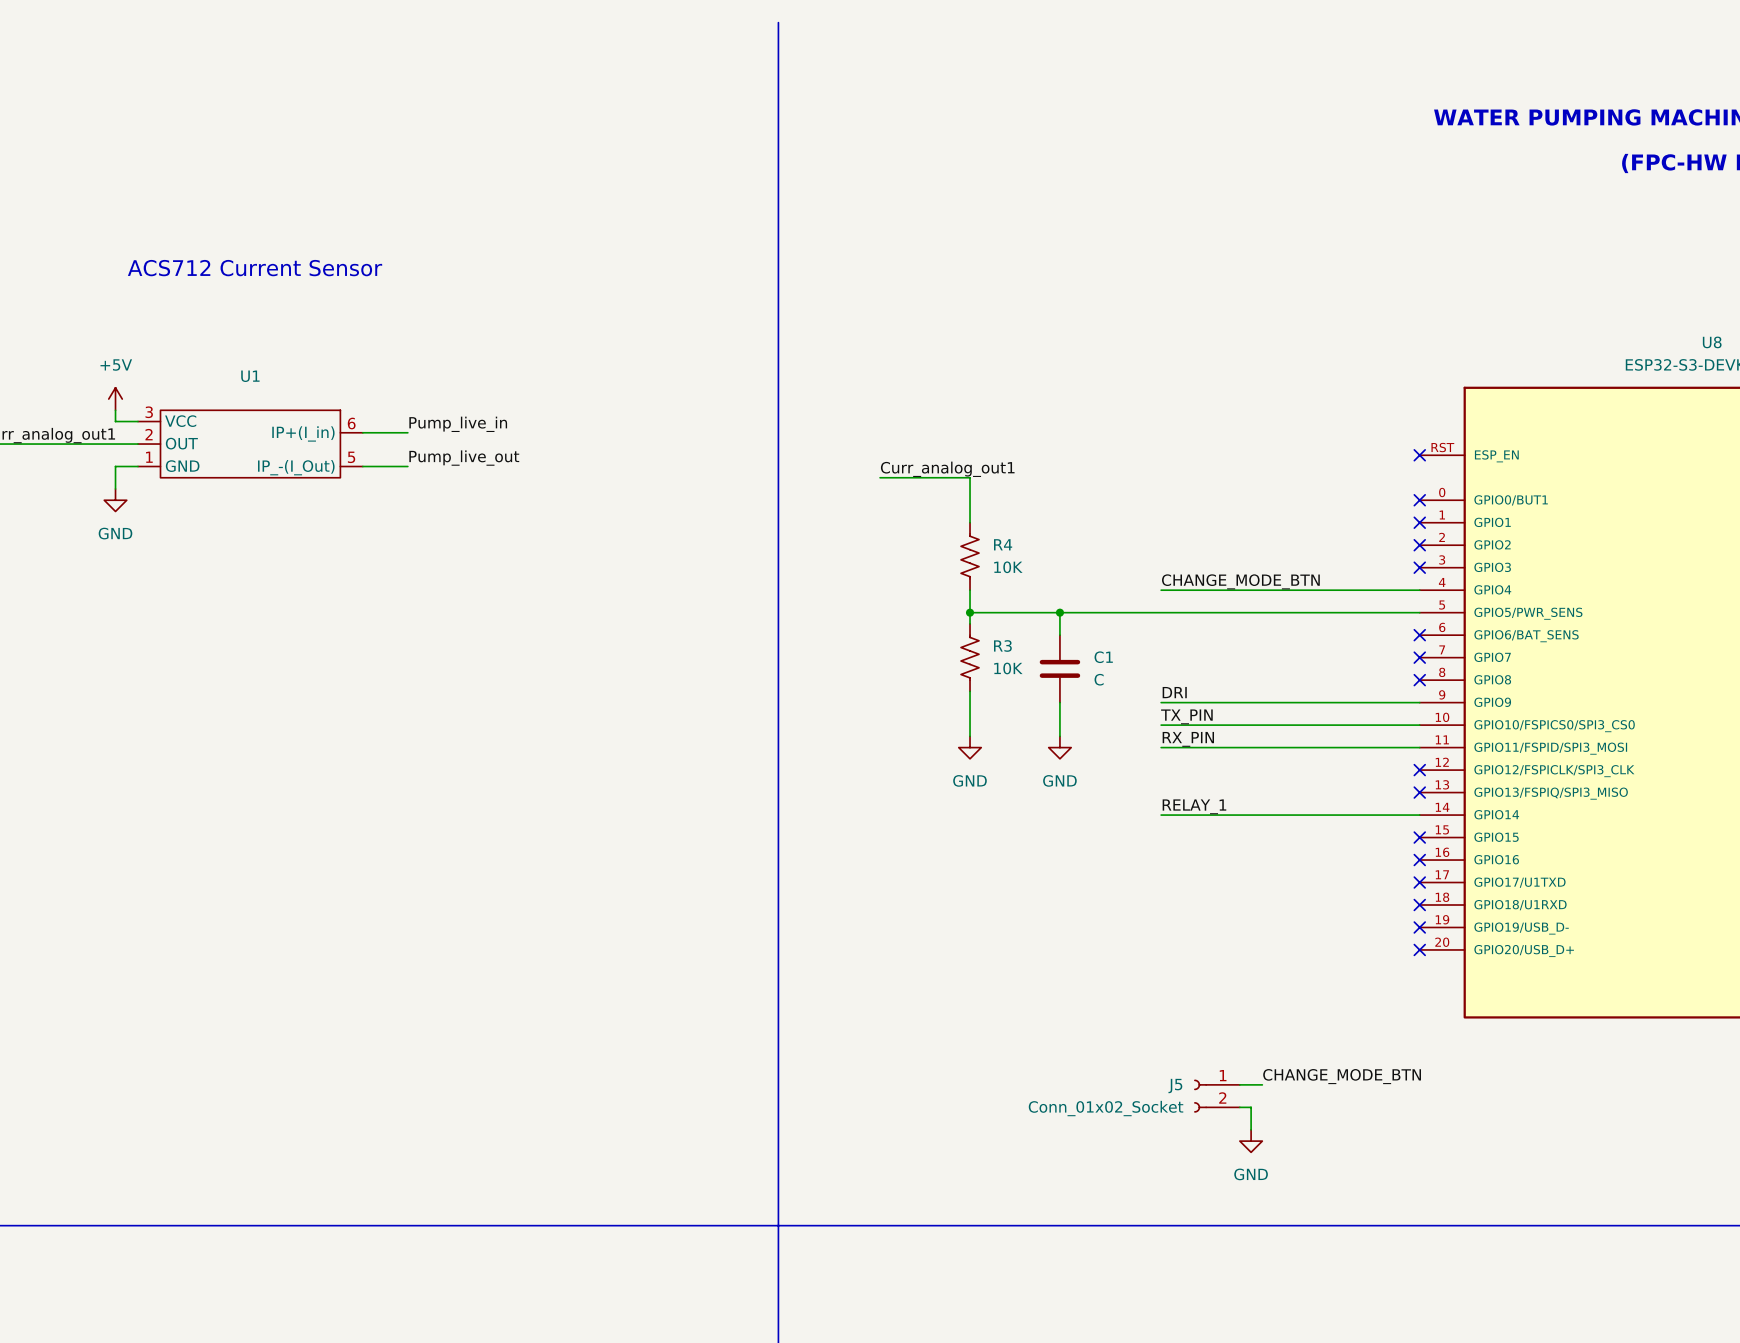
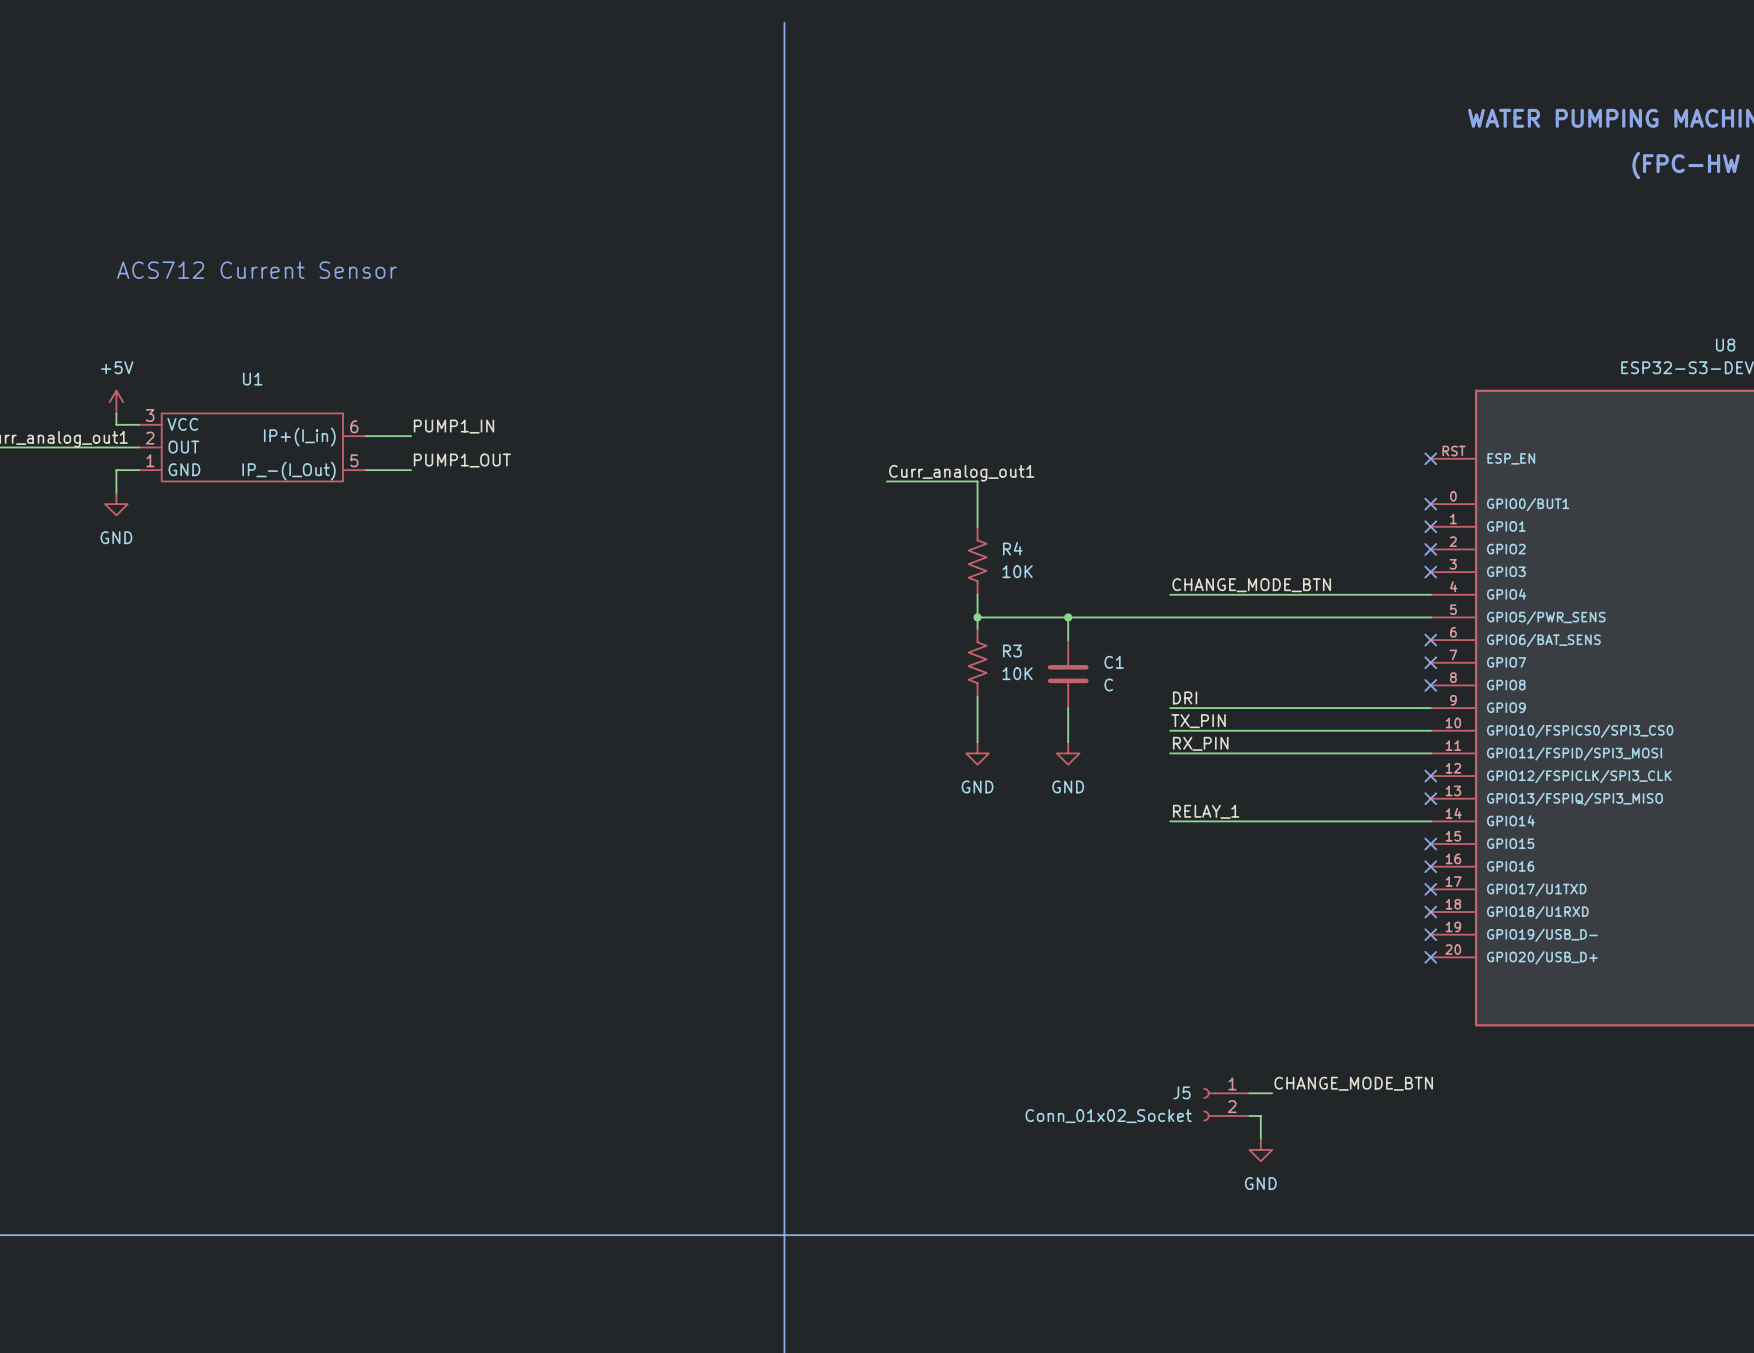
label: Pump_live_in (458, 424) -> PUMP1_IN (453, 426)
label: Pump_live_out (464, 458) -> PUMP1_OUT (462, 460)

